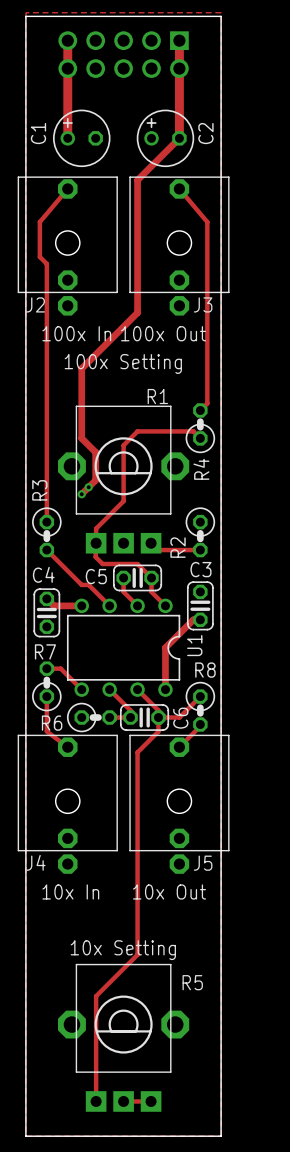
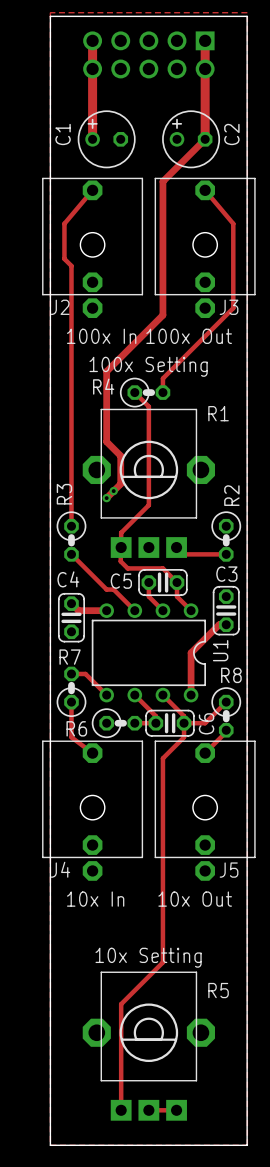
track: (207, 305) (207, 403) (200, 410) -> (233, 308) (162, 378) (162, 392)
R1 name position: R1 (157, 396) -> R1 (218, 413)
R4 rotation: 0° (200, 428) -> 90° clockwise (145, 392)
R4 position: (200, 428) -> (145, 392)
track: (200, 438) (193, 431) (137, 431) (123, 445) -> (134, 392) (148, 406) (148, 448)
R2 name position: R2 (178, 547) -> R2 (231, 495)

